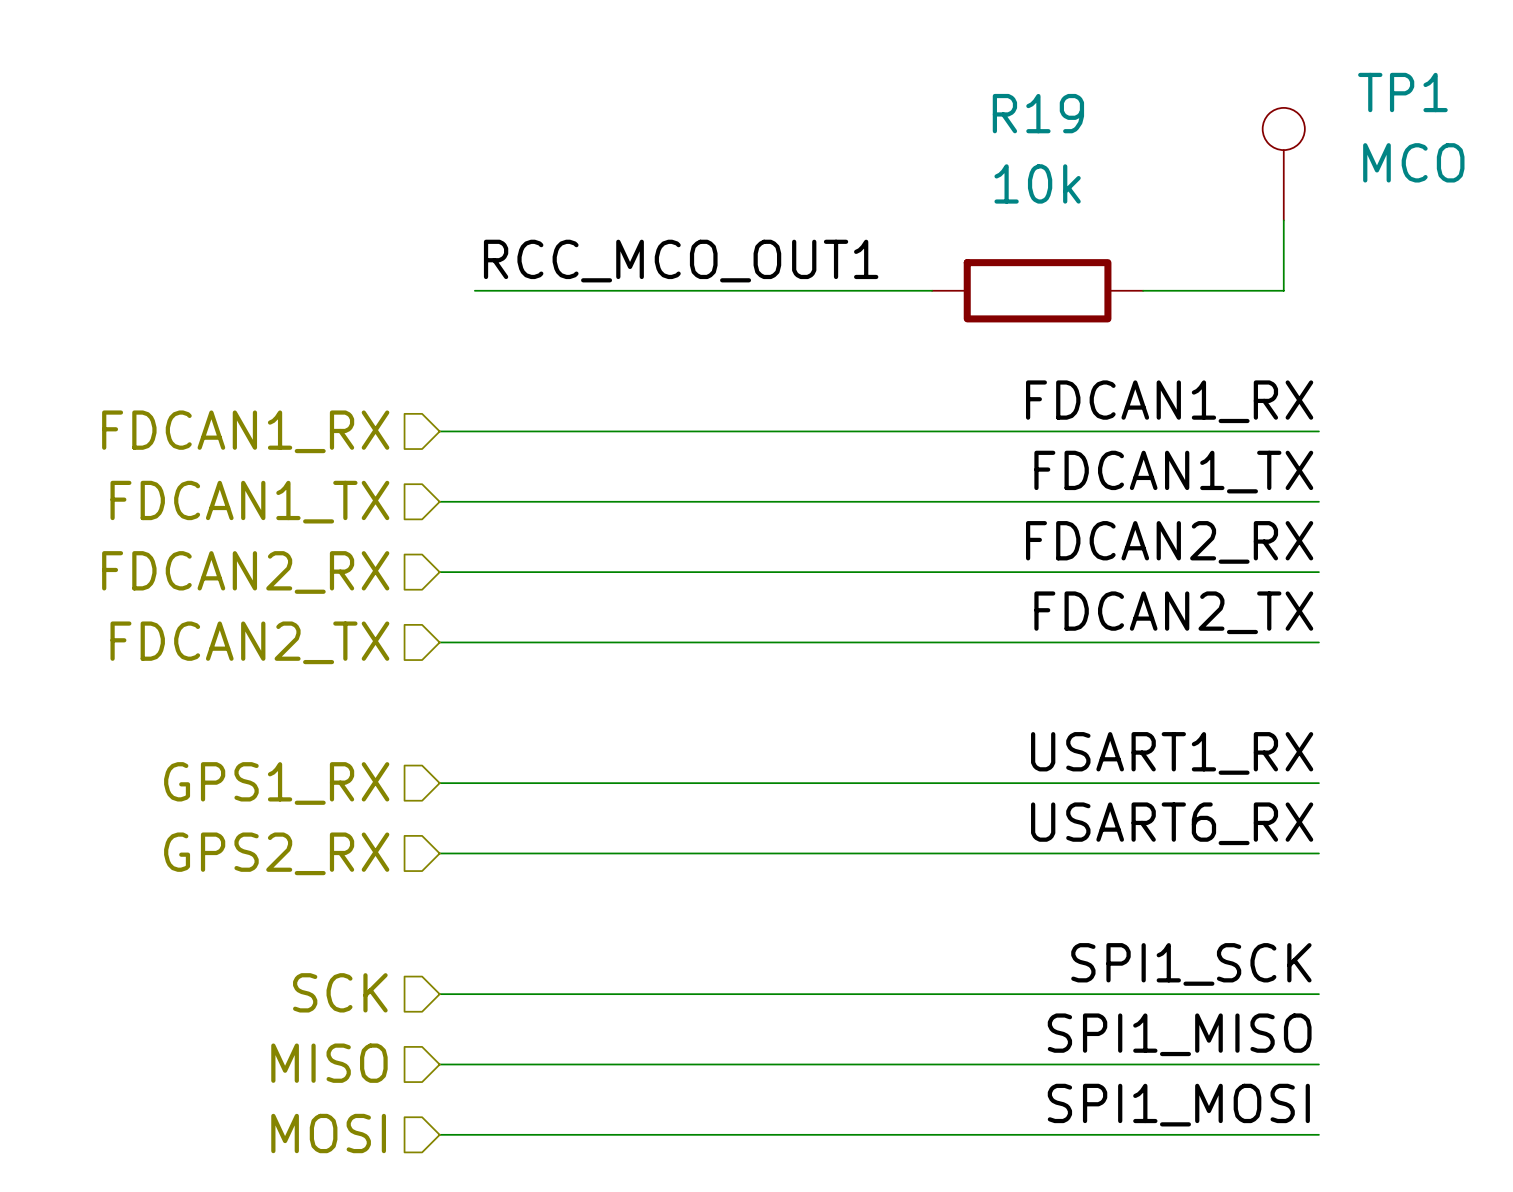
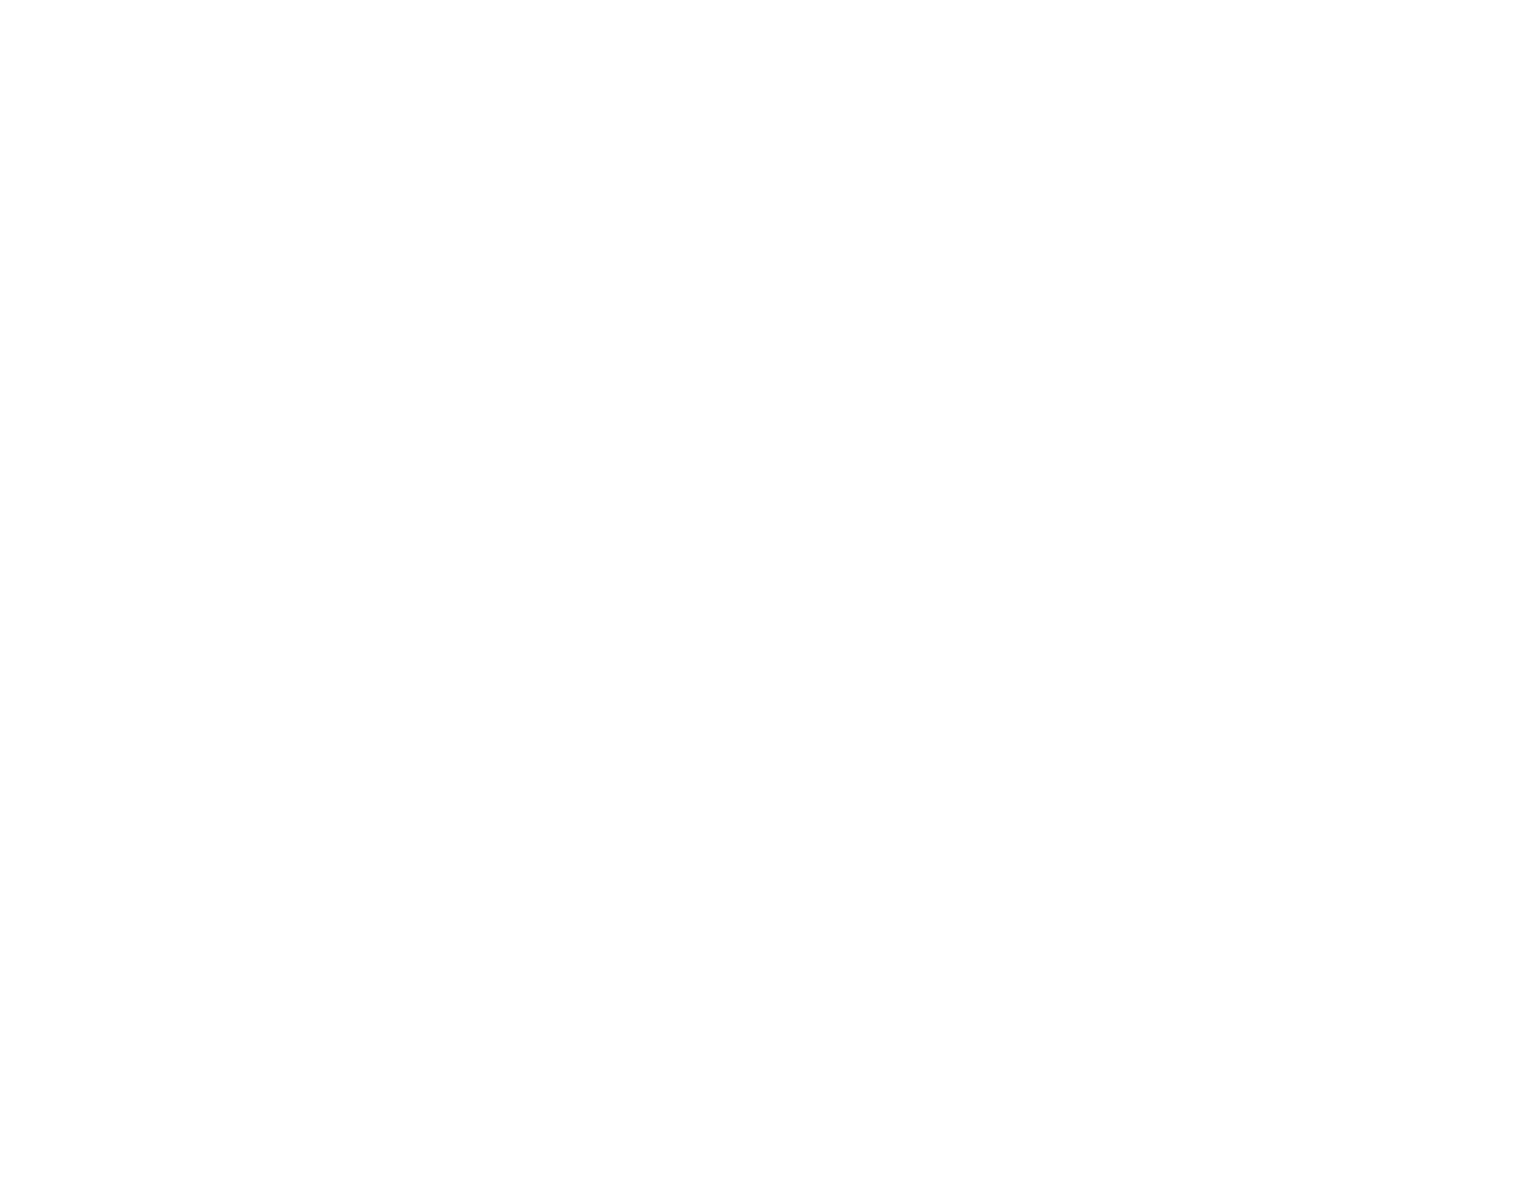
TP1: MCO (1283, 164) -> none
wire: (1283, 220) (1283, 290) (1143, 290) -> none
label: RCC_MCO_OUT1 (681, 261) -> none
wire: (474, 290) (932, 290) -> none
R19: 10k (1037, 290) -> none
label: FDCAN1_RX (1169, 401) -> none
hierarchical label: FDCAN1_RX (245, 431) -> none
wire: (439, 431) (1318, 431) -> none
label: FDCAN1_TX (1173, 472) -> none
wire: (439, 501) (1318, 501) -> none
hierarchical label: FDCAN1_TX (249, 502) -> none
label: FDCAN2_RX (1169, 542) -> none
hierarchical label: FDCAN2_RX (245, 572) -> none
wire: (439, 572) (1318, 572) -> none
label: FDCAN2_TX (1173, 612) -> none
hierarchical label: FDCAN2_TX (249, 642) -> none
wire: (439, 642) (1318, 642) -> none
label: USART1_RX (1172, 753) -> none
hierarchical label: GPS1_RX (276, 783) -> none
wire: (439, 783) (1318, 783) -> none
label: USART6_RX (1172, 823) -> none
hierarchical label: GPS2_RX (276, 853) -> none
wire: (439, 853) (1318, 853) -> none
label: SPI1_SCK (1191, 964) -> none
hierarchical label: SCK (340, 992) -> none
wire: (439, 994) (1318, 994) -> none
label: SPI1_MISO (1179, 1034) -> none
hierarchical label: MISO (329, 1063) -> none
wire: (439, 1064) (1318, 1064) -> none
label: SPI1_MOSI (1178, 1105) -> none
hierarchical label: MOSI (328, 1133) -> none
wire: (439, 1134) (1318, 1134) -> none

